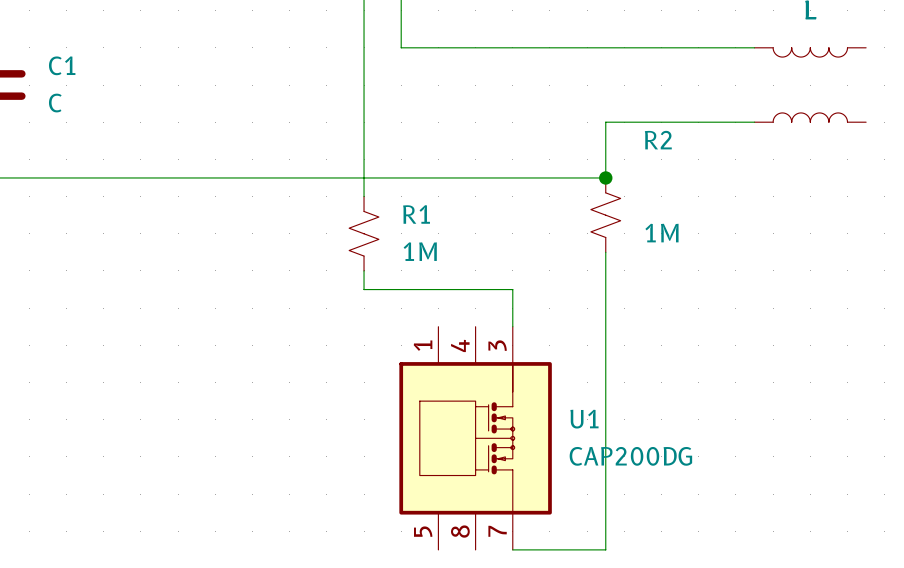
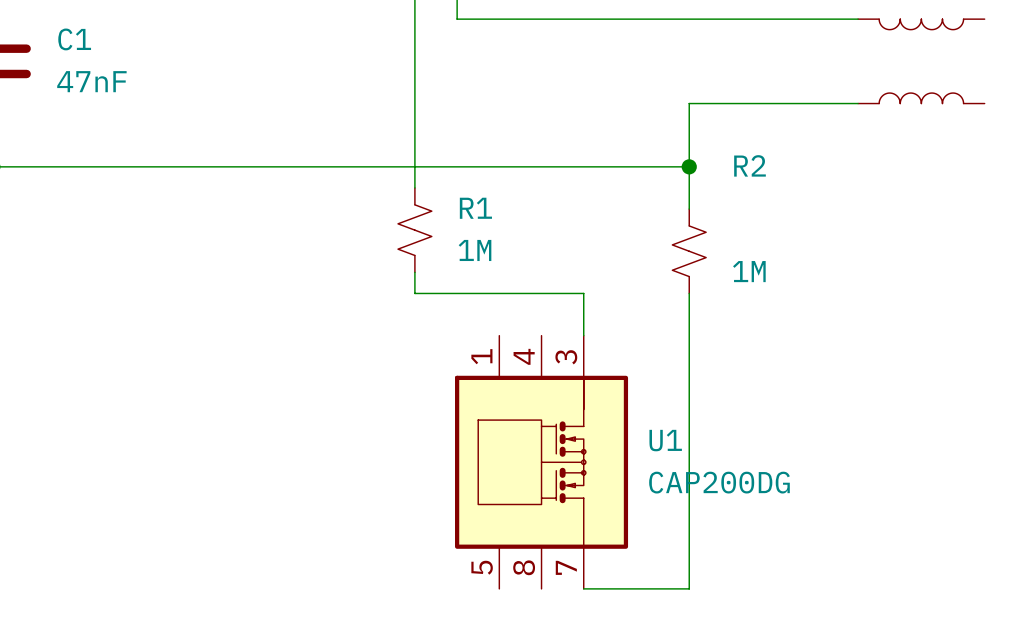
C1 value: C (55, 103) -> 47nF (91, 81)
R2 position: (605, 215) -> (689, 251)
wire: (605, 252) (605, 289) -> (689, 166) (689, 209)

